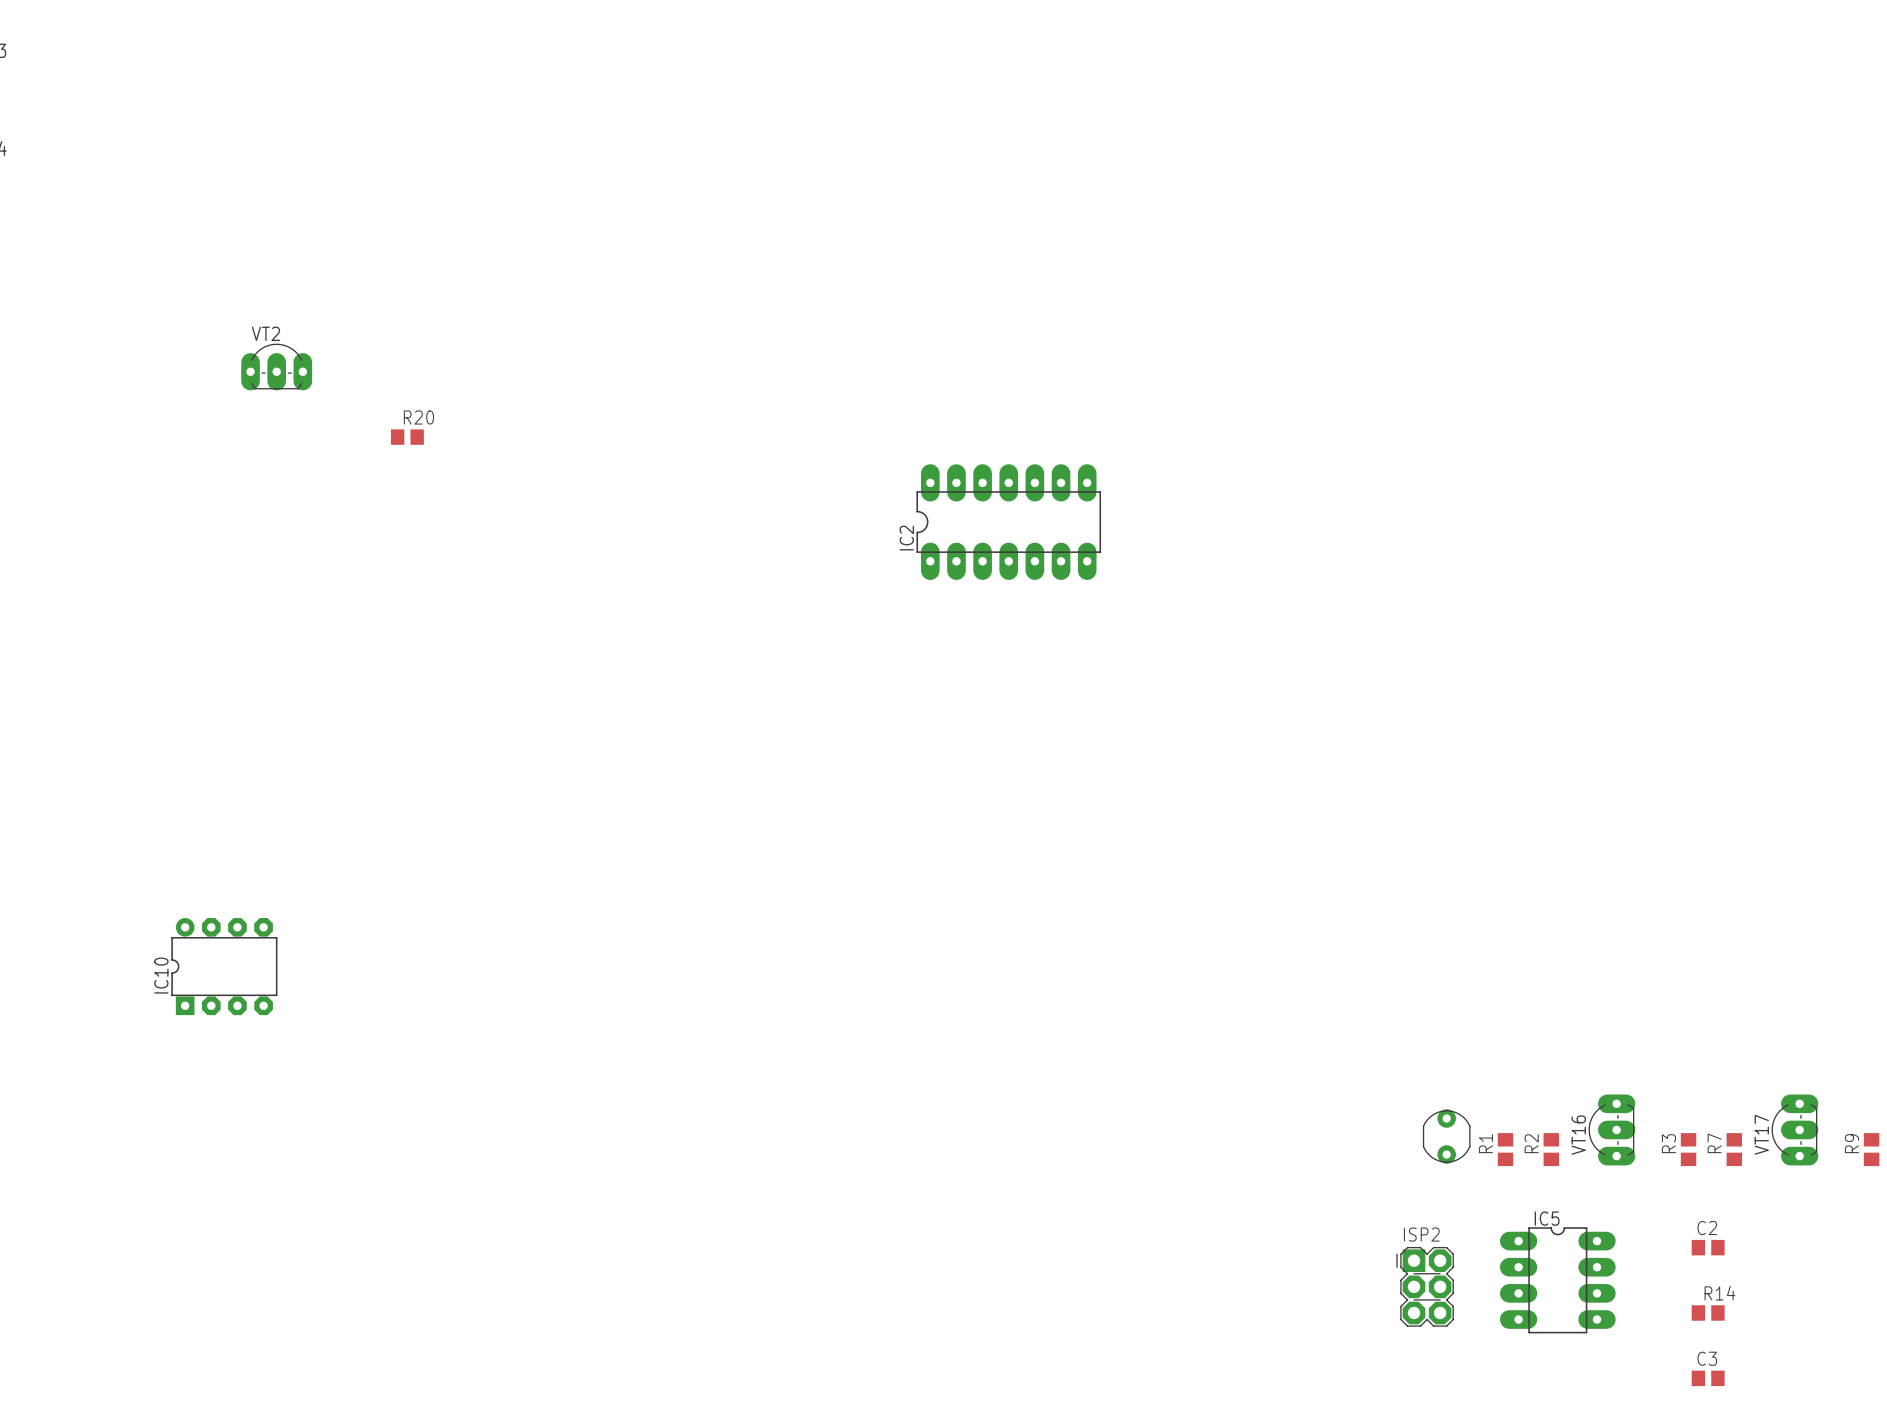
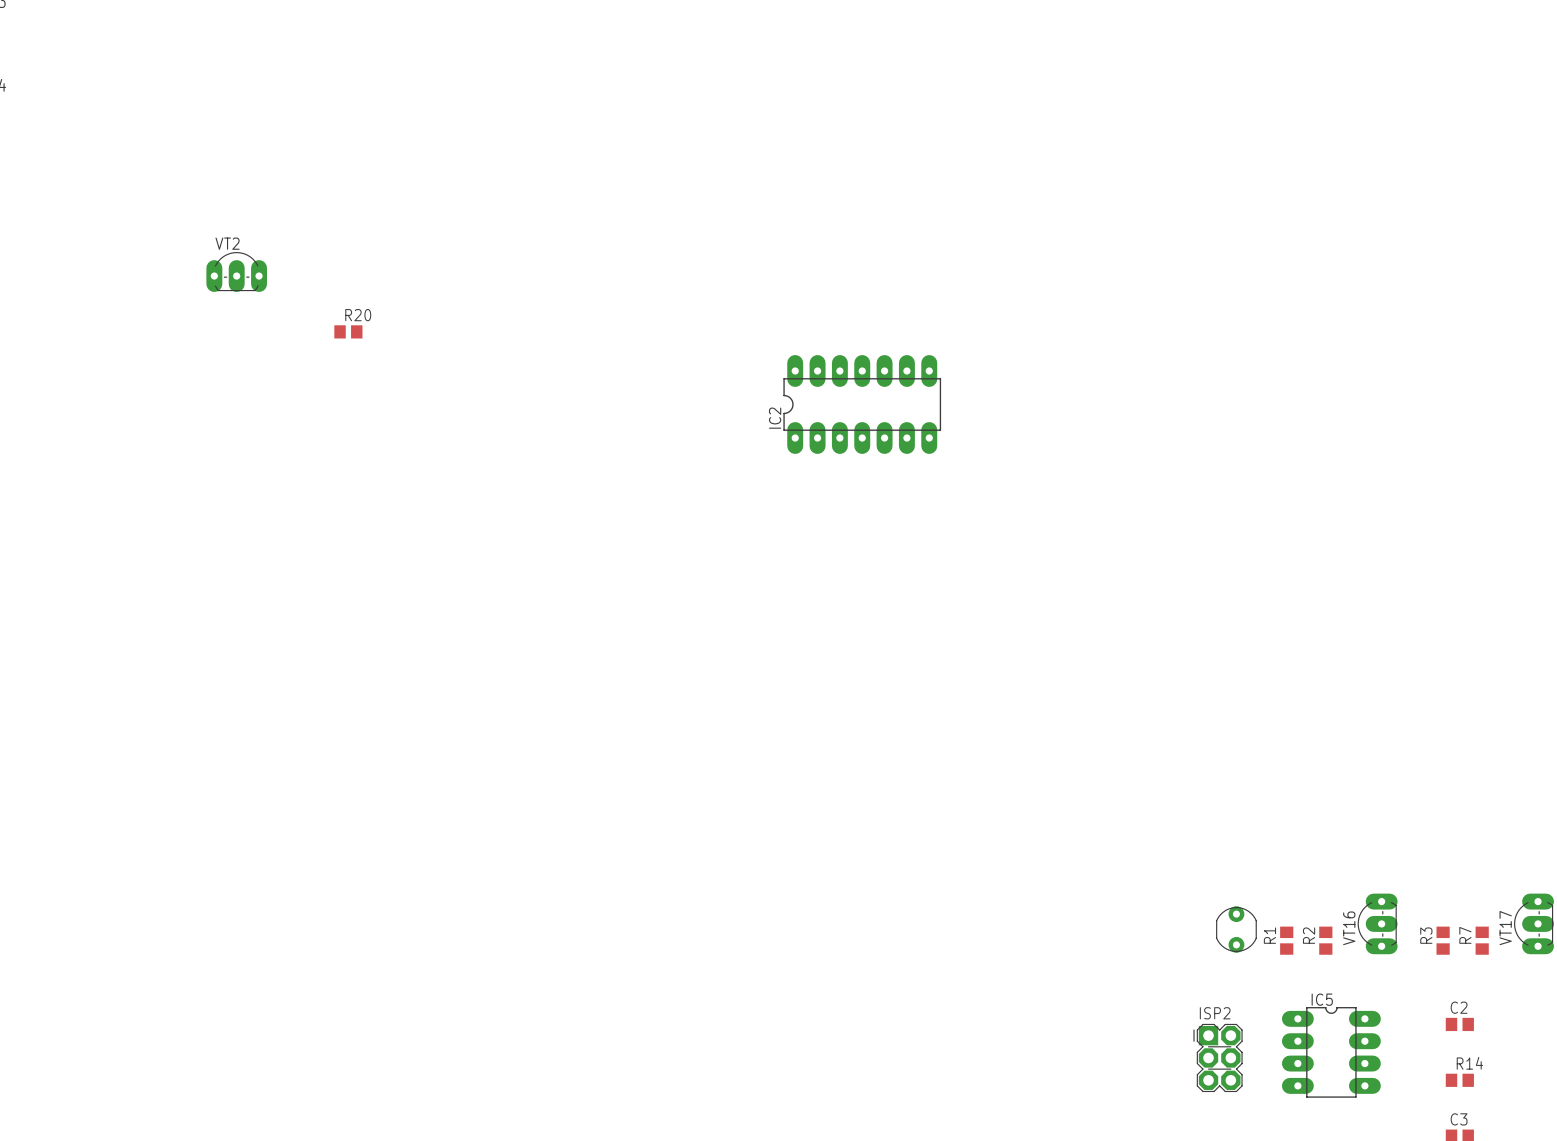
IC10: (224, 966) -> none

